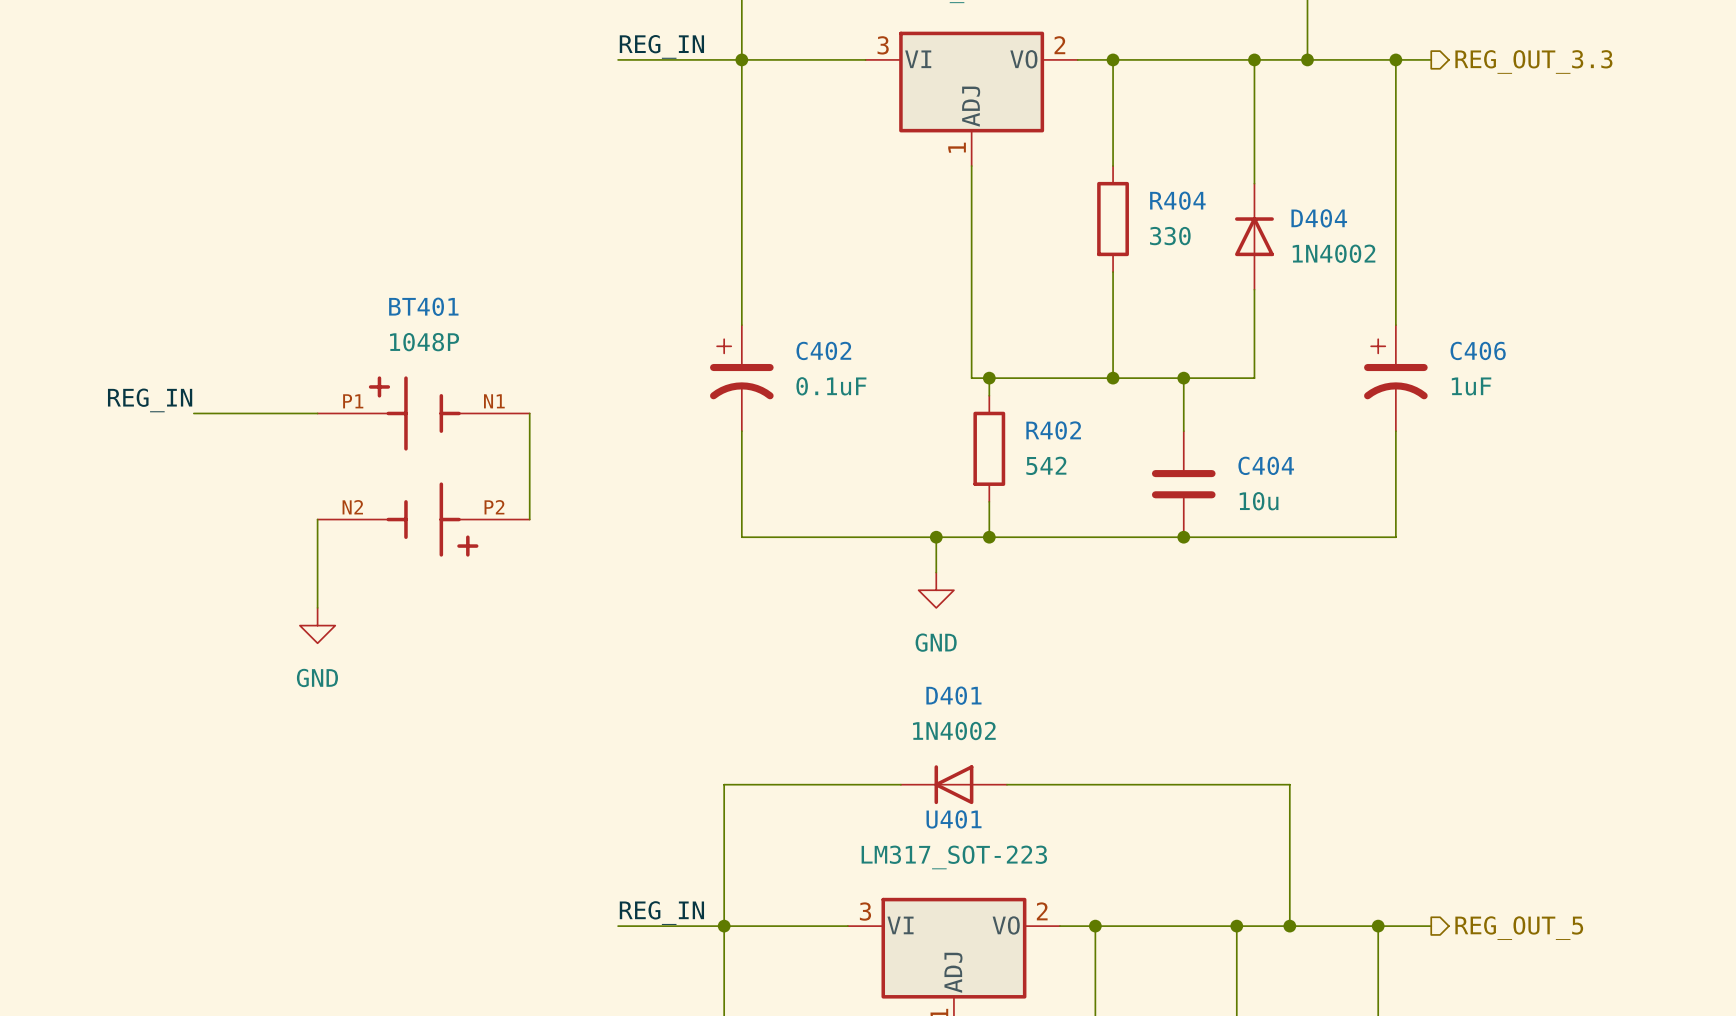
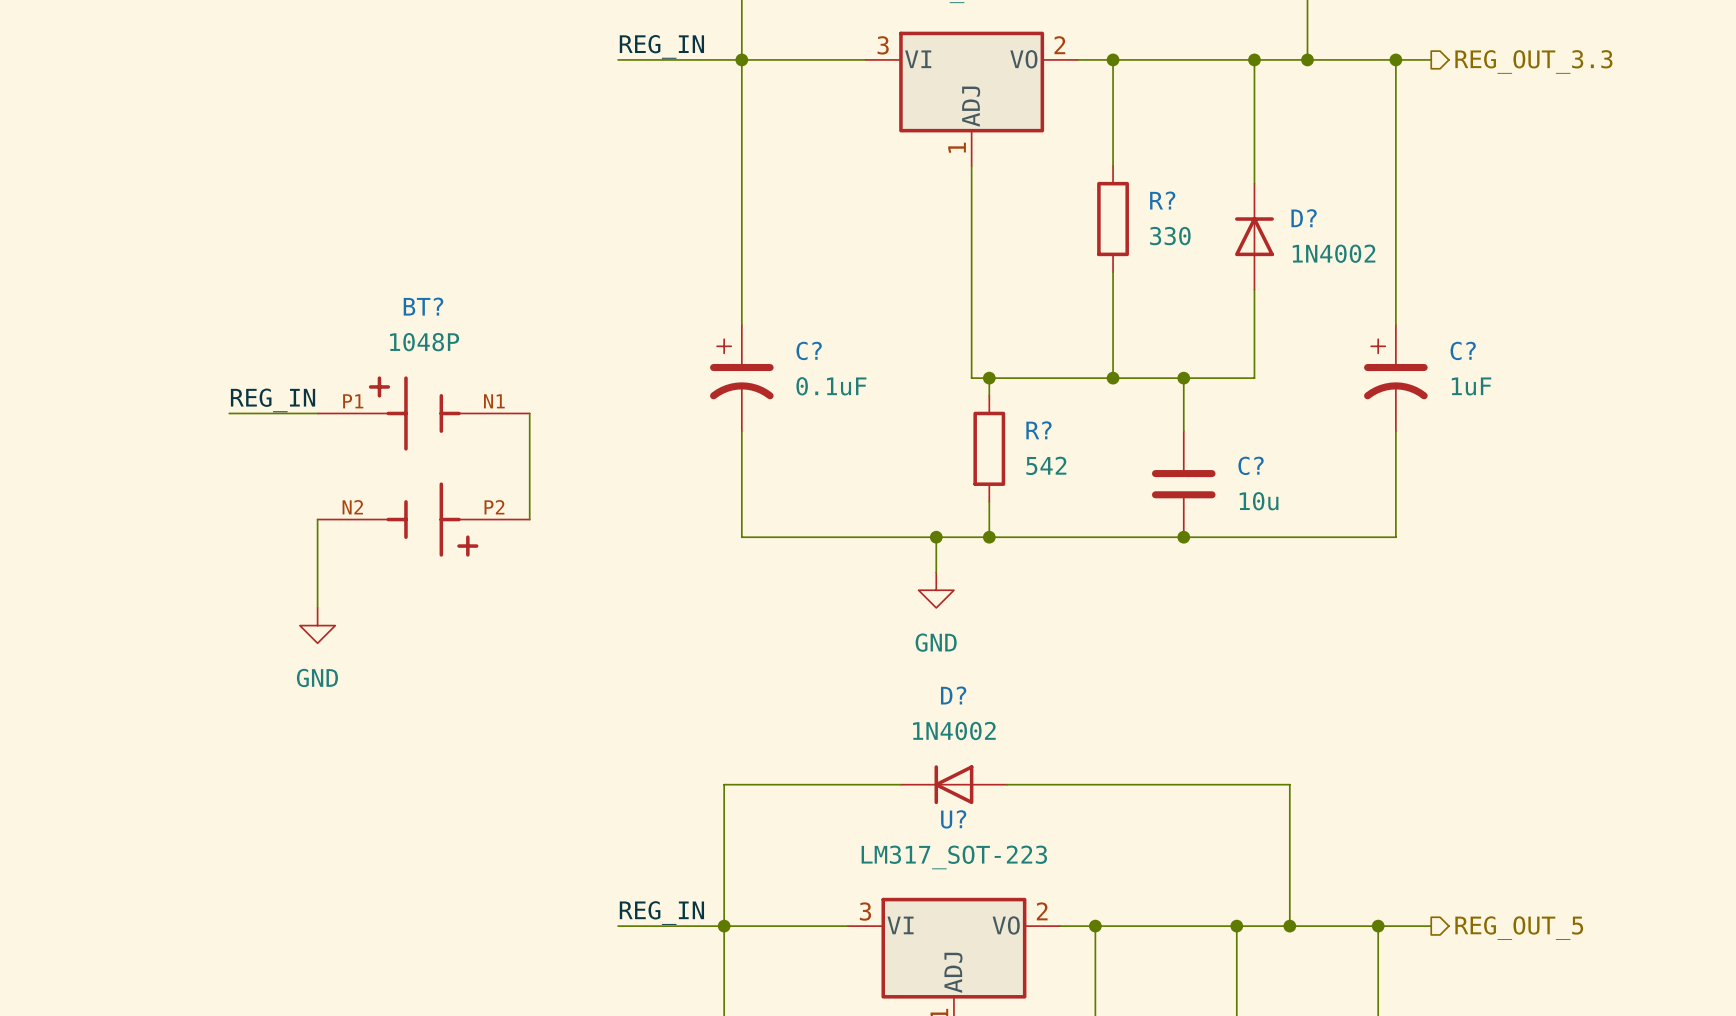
R404 name: R404 (1177, 200) -> R? (1162, 200)
D404 name: D404 (1319, 218) -> D? (1304, 218)
BT401 name: BT401 (423, 306) -> BT? (423, 306)
C402 name: C402 (823, 350) -> C? (809, 350)
C406 name: C406 (1478, 350) -> C? (1463, 350)
label position: REG_IN (150, 400) -> REG_IN (273, 400)
wire: (193, 413) (229, 413) -> none
R402 name: R402 (1053, 430) -> R? (1038, 430)
C404 name: C404 (1266, 465) -> C? (1251, 465)
D401 name: D401 (953, 695) -> D? (953, 695)
U401 name: U401 (954, 819) -> U? (953, 819)

